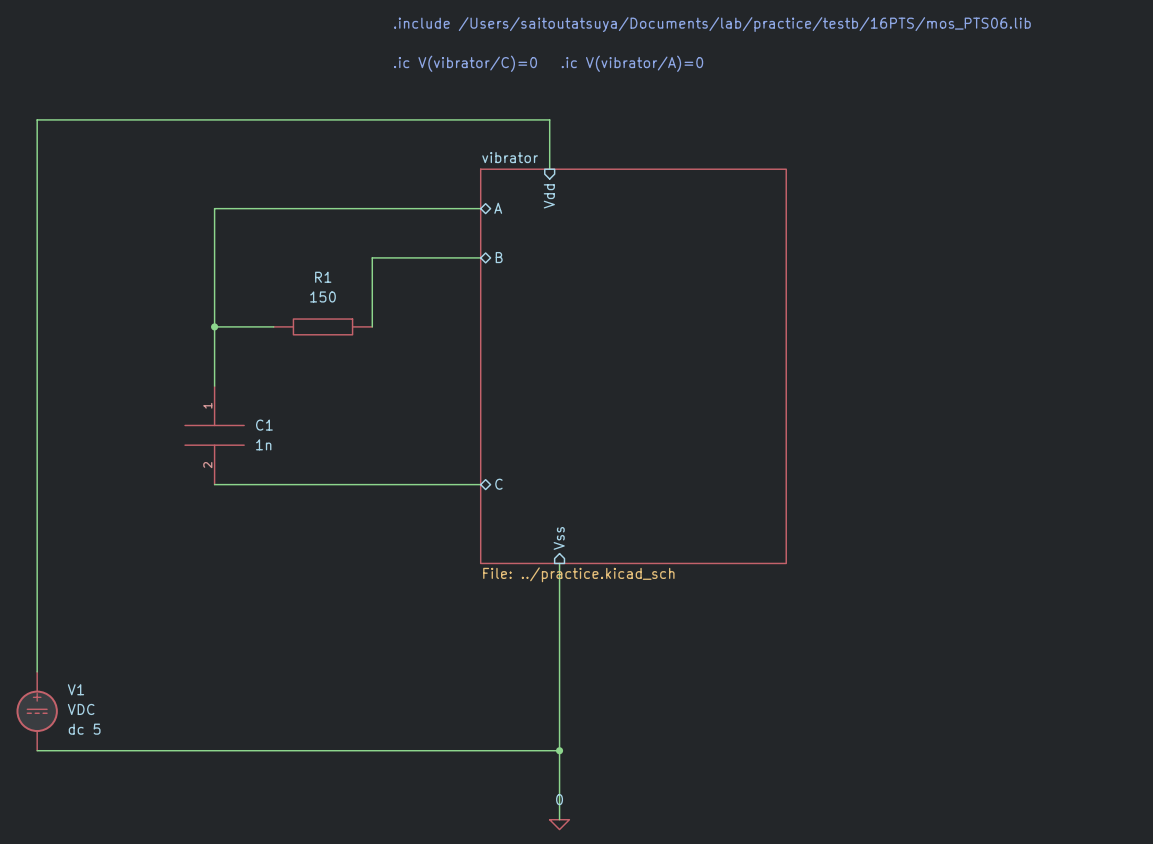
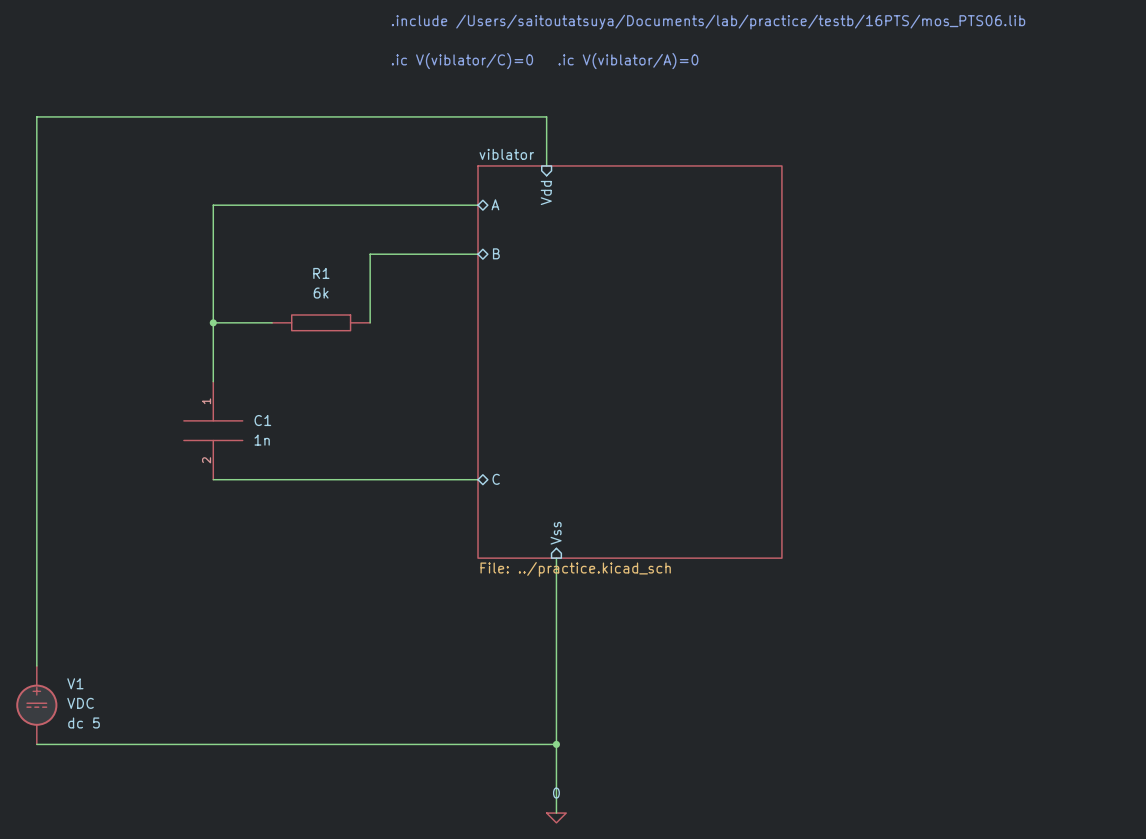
text: .ic V(vibrator/C)=0 (465, 63) -> .ic V(viblator/C)=0 (462, 61)
text: .ic V(vibrator/A)=0 (632, 63) -> .ic V(viblator/A)=0 (628, 61)
sheet vibrator name: vibrator (510, 157) -> viblator (506, 154)
R1 value: 150 (323, 296) -> 6k (321, 293)

